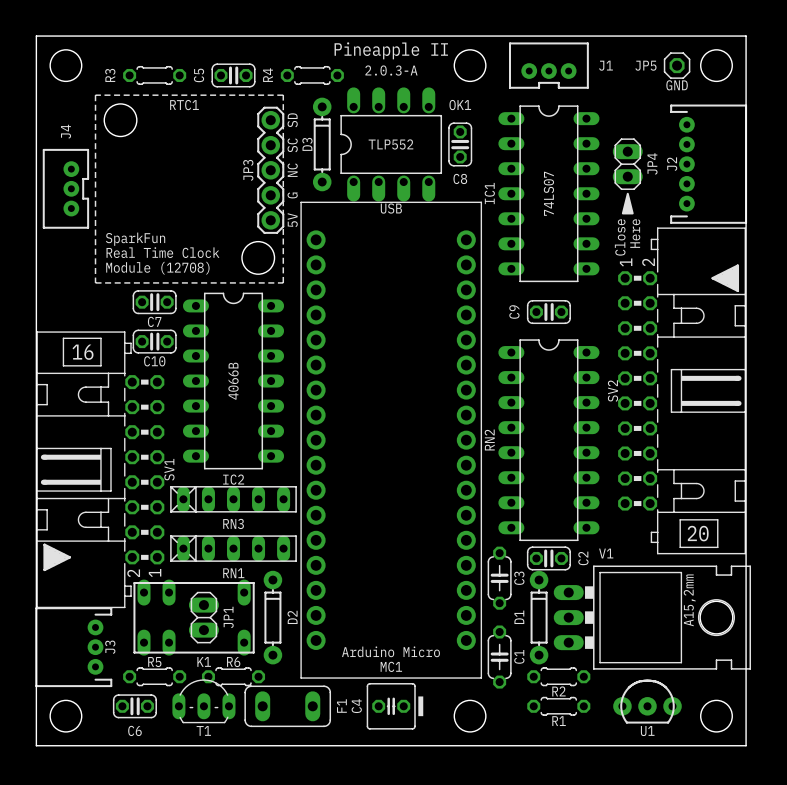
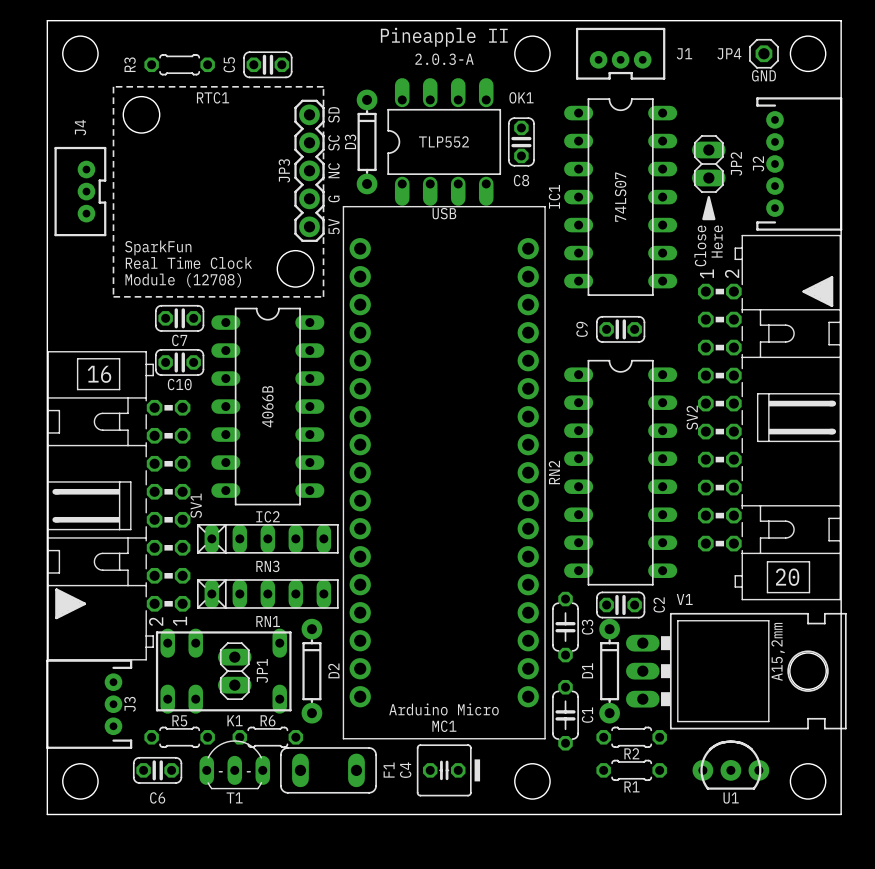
JP5 name: JP5 (645, 65) -> JP4 (729, 53)
R4: (312, 75) -> none
JP4 name: JP4 (652, 163) -> JP2 (736, 163)

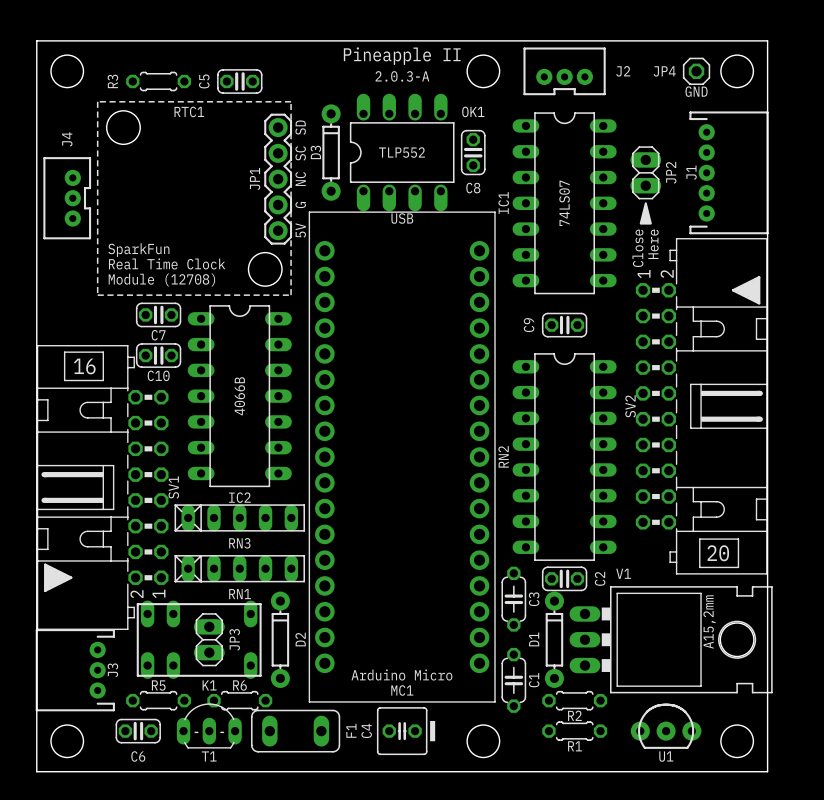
J1 name: J1 (684, 53) -> J2 (623, 71)
J2 name: J2 (758, 163) -> J1 (691, 172)
JP3 name: JP3 (284, 170) -> JP1 (255, 178)
JP1 name: JP1 (262, 670) -> JP3 (234, 639)

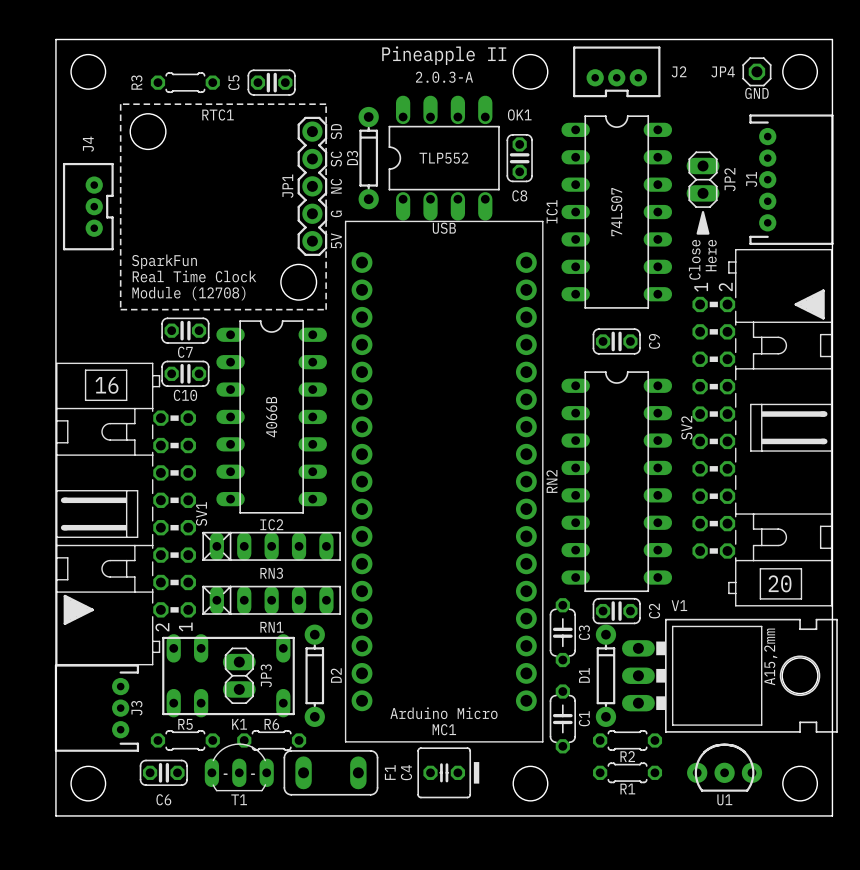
C9 rotation: 0° (564, 325) -> 180° (616, 341)

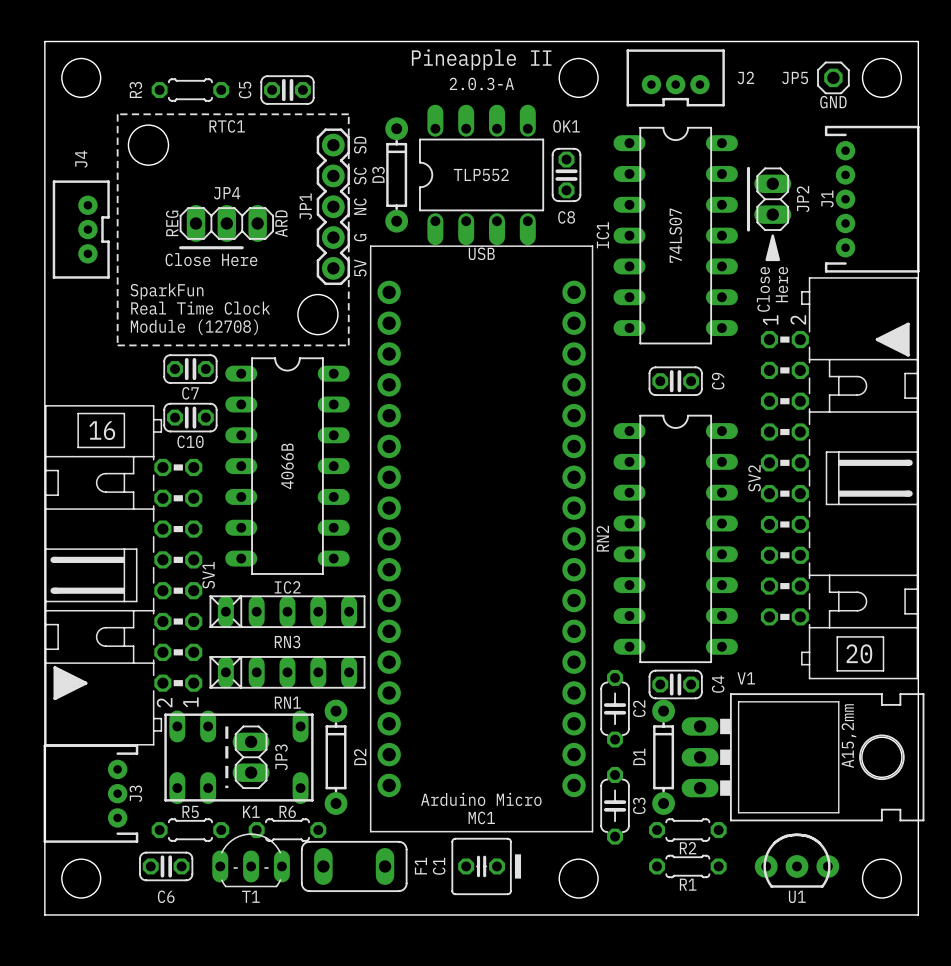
JP4 name: JP4 (723, 71) -> JP5 (795, 78)
line: none -> (748, 168) (748, 230)
text: none -> REG (172, 223)
JP4: none -> (226, 223)
text: none -> ARD (281, 223)
line: none -> (180, 247) (242, 247)
text: none -> Close Here (211, 259)
C2 name: C2 (654, 611) -> C4 (718, 684)
C3 name: C3 (584, 632) -> C2 (639, 708)
line: none -> (226, 726) (226, 788)
C1 name: C1 (584, 718) -> C3 (639, 805)
C4 name: C4 (406, 772) -> C1 (439, 866)

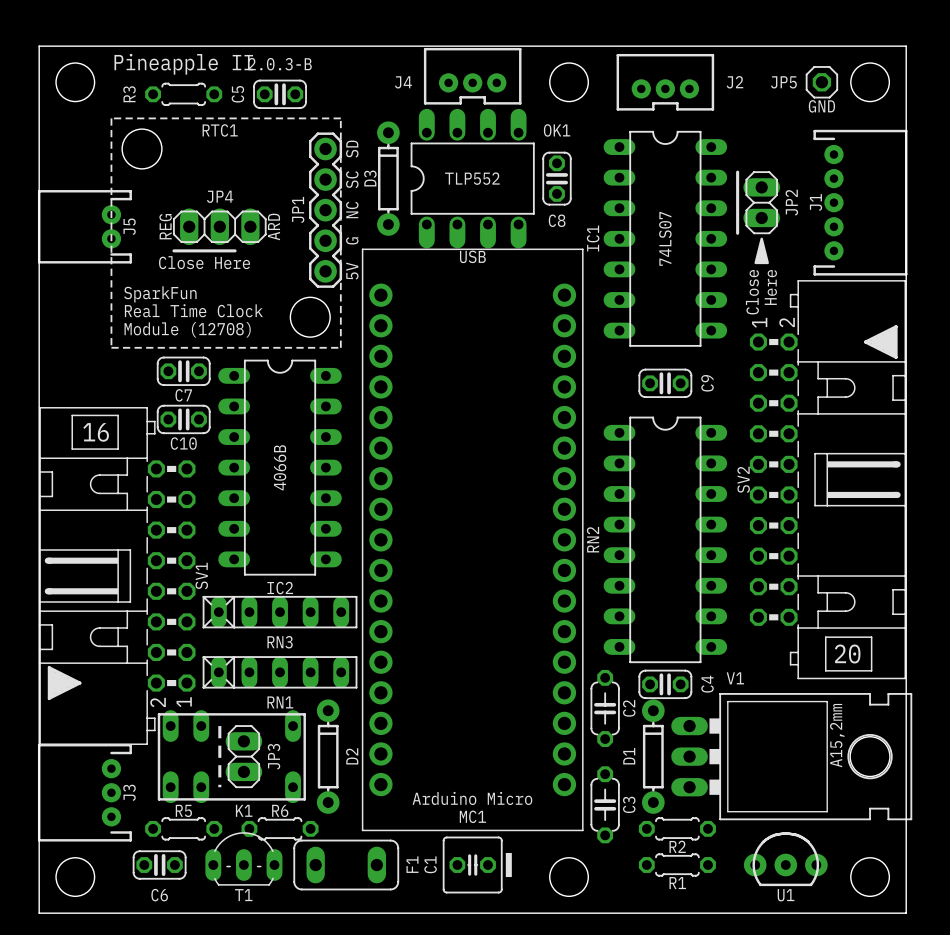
text: none -> 2.0.3-B (280, 64)
text position: Pineapple II (481, 59) -> Pineapple II (183, 64)
text: 2.0.3-A (481, 83) -> none
J4 name position: J4 (81, 159) -> J4 (403, 82)
J5: none -> (84, 226)
J4 rotation: 0° (81, 229) -> 90° clockwise (472, 76)
J4 position: (81, 229) -> (472, 76)

